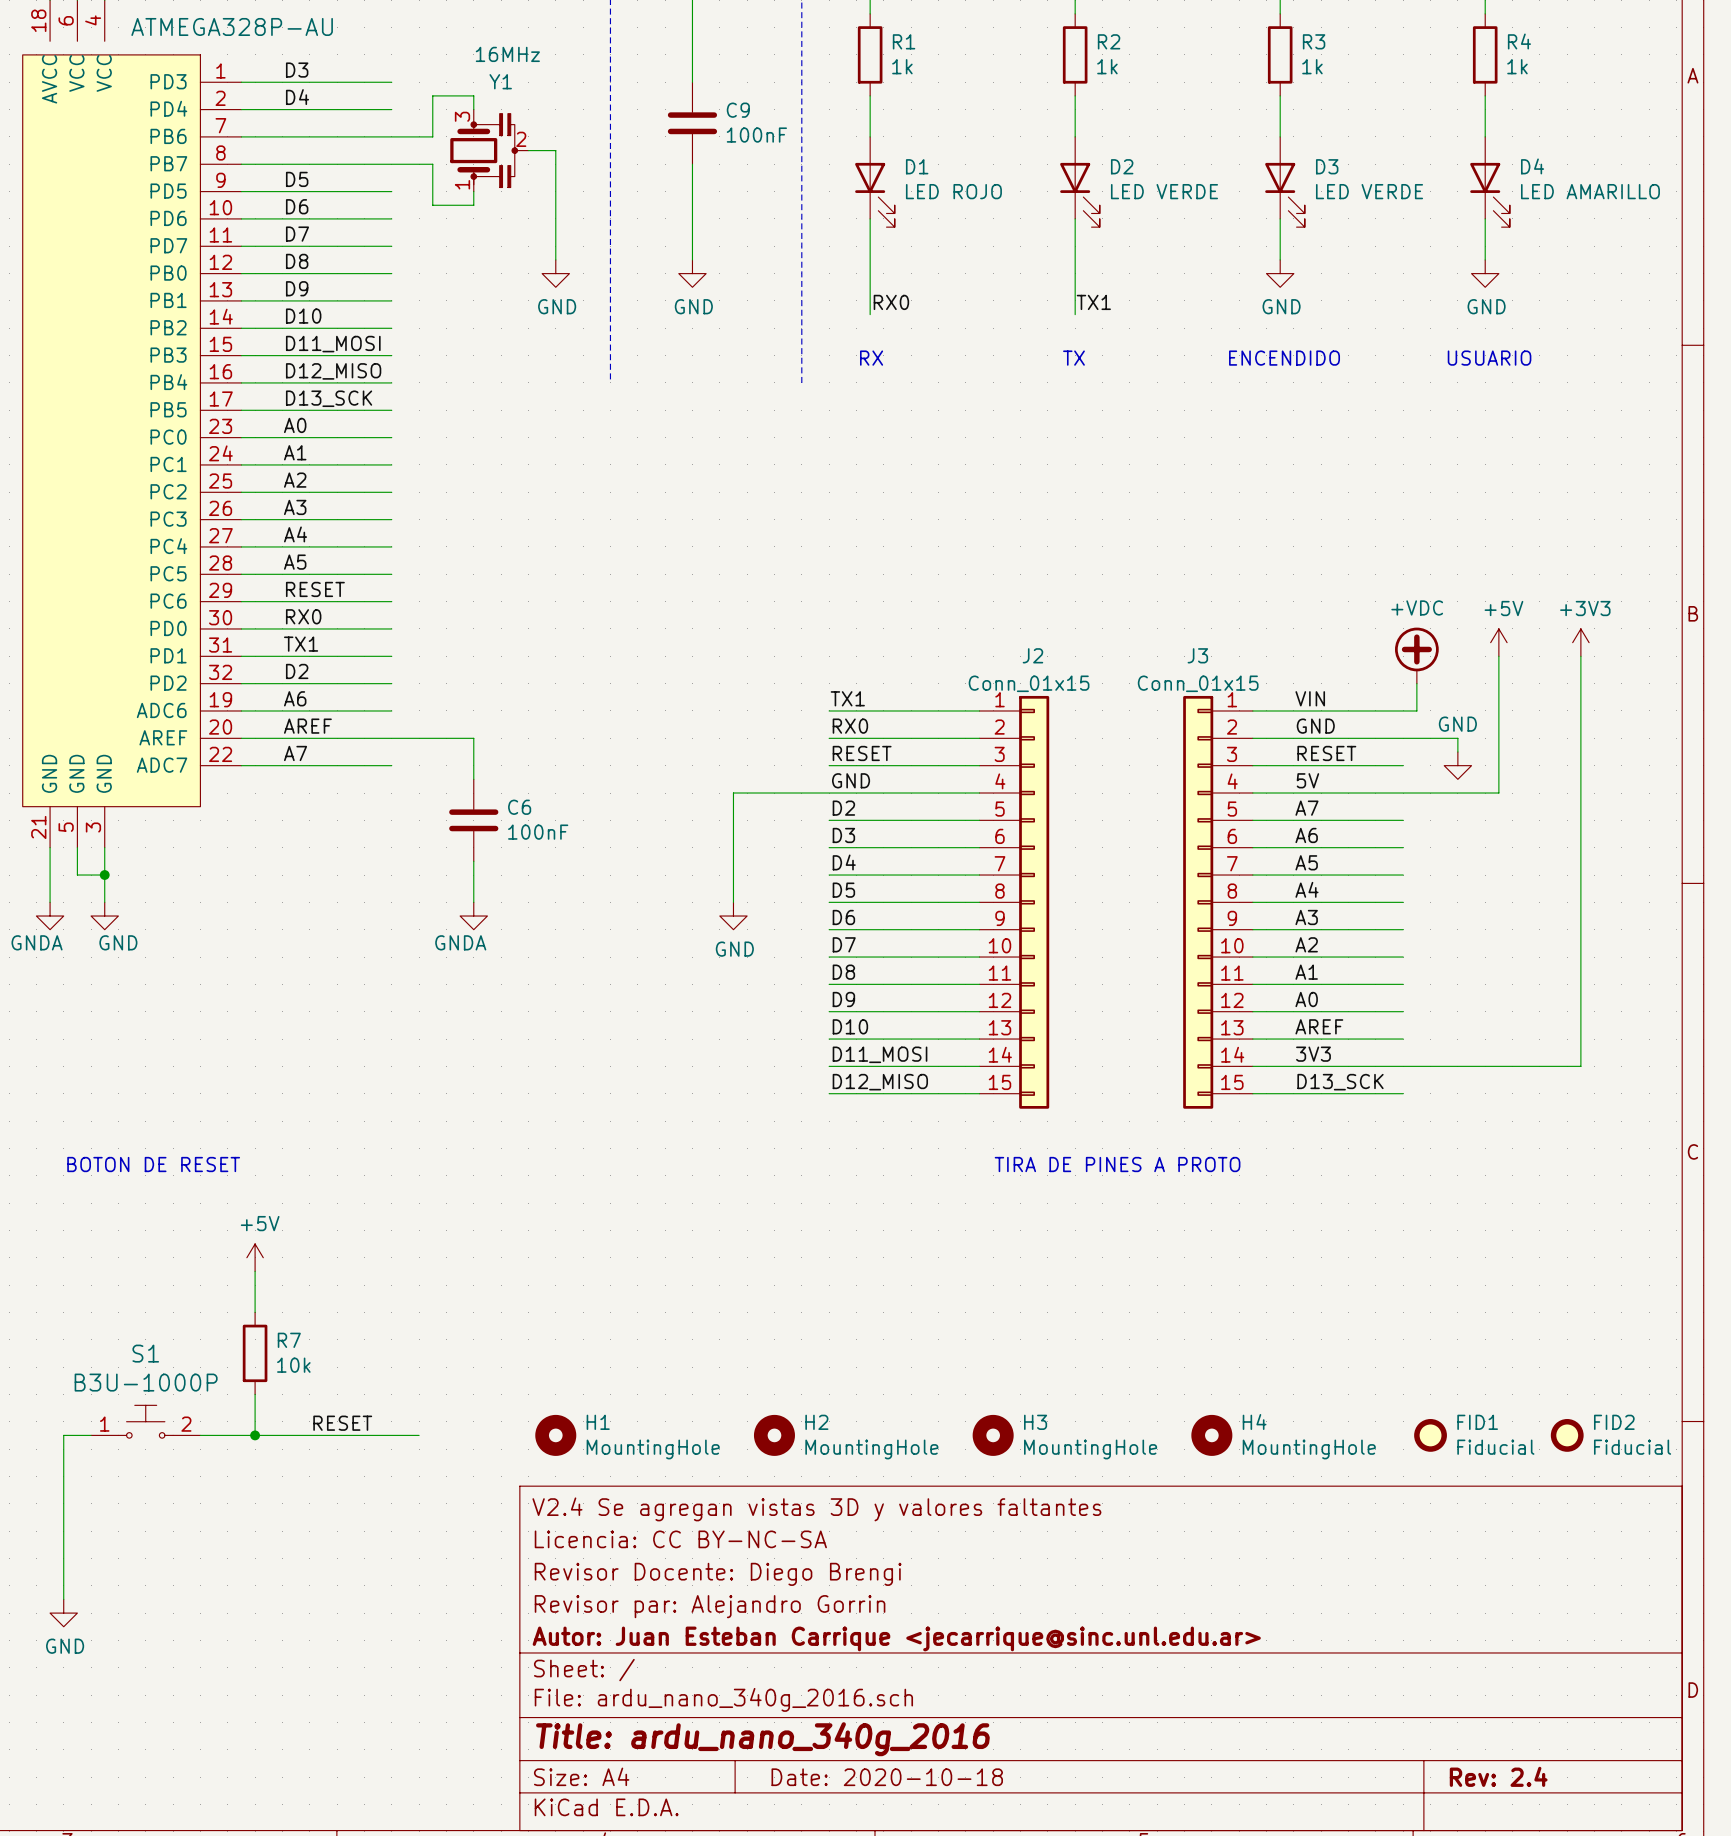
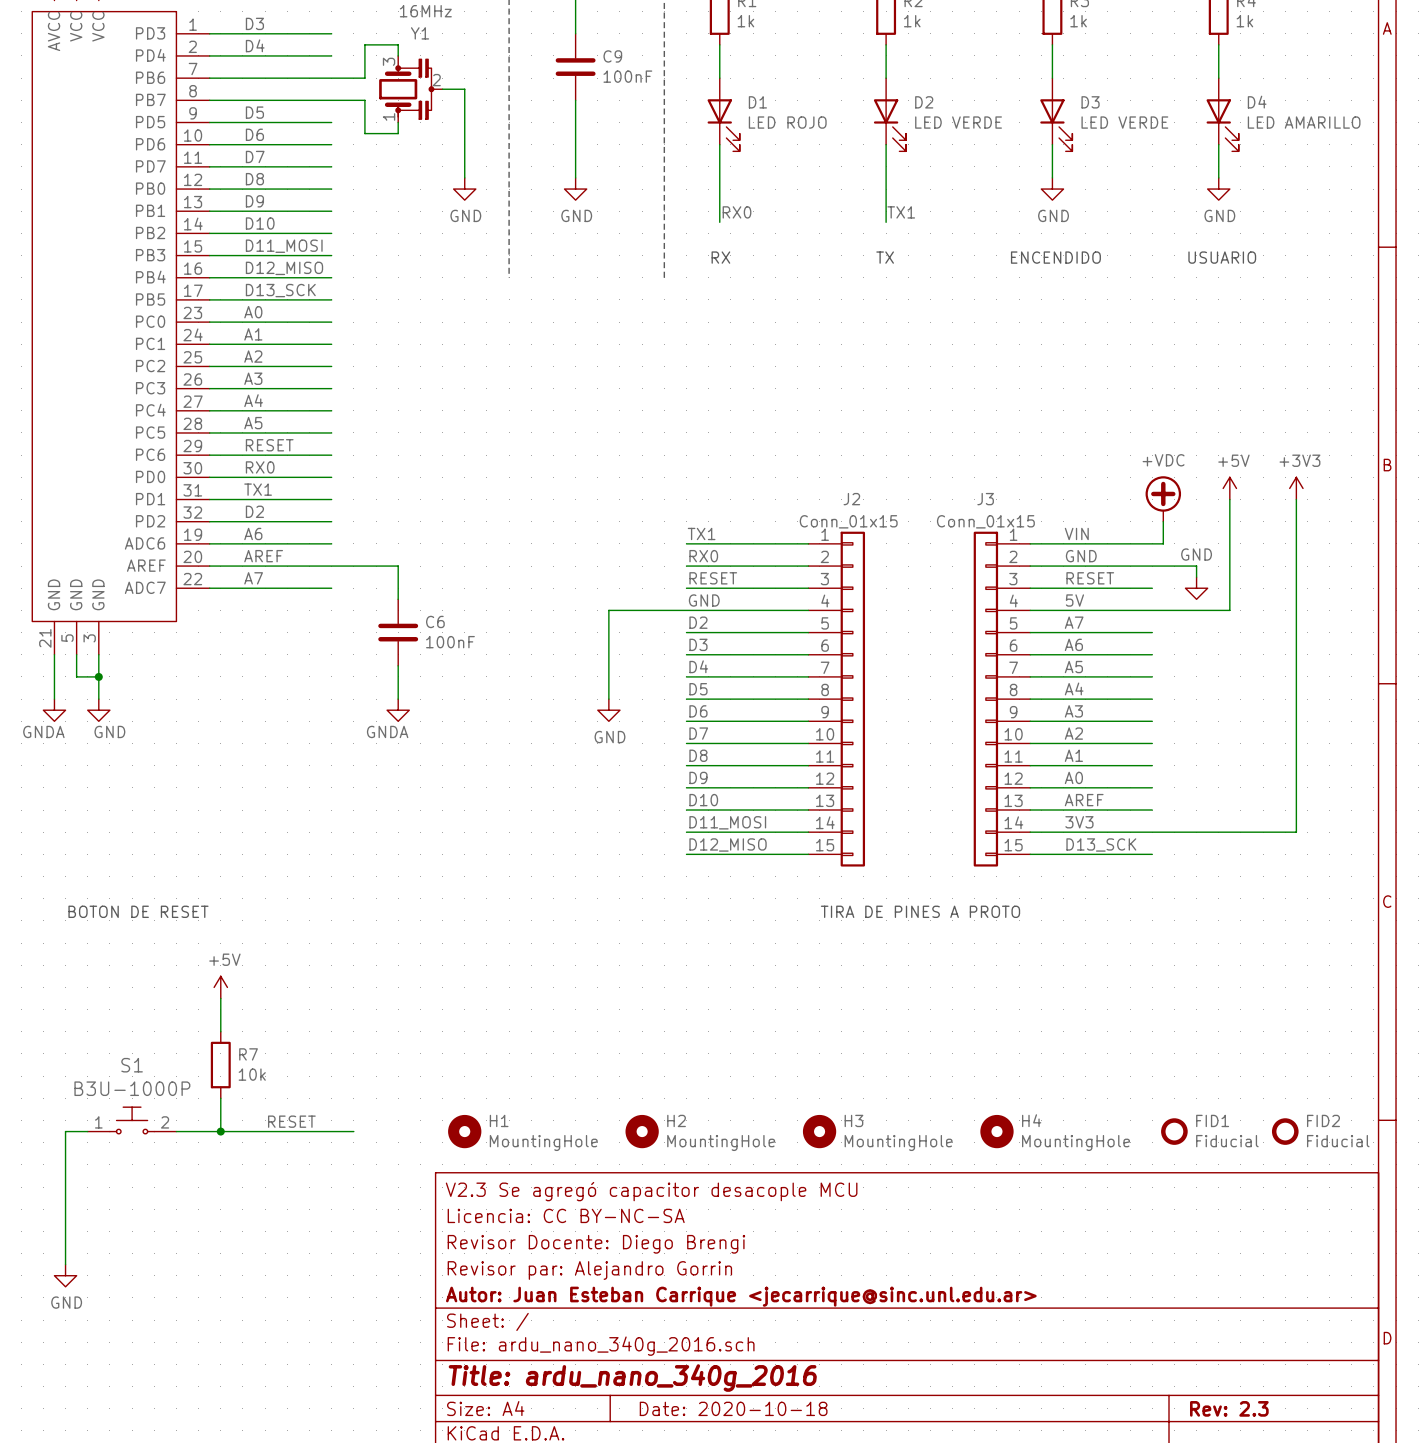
title block: V2.4 Se agregan vistas 3D y valores faltantes (816, 1509) -> V2.3 Se agregó capacitor desacople MCU (651, 1191)
title block: Rev: 2.4 (1498, 1776) -> Rev: 2.3 (1229, 1408)

